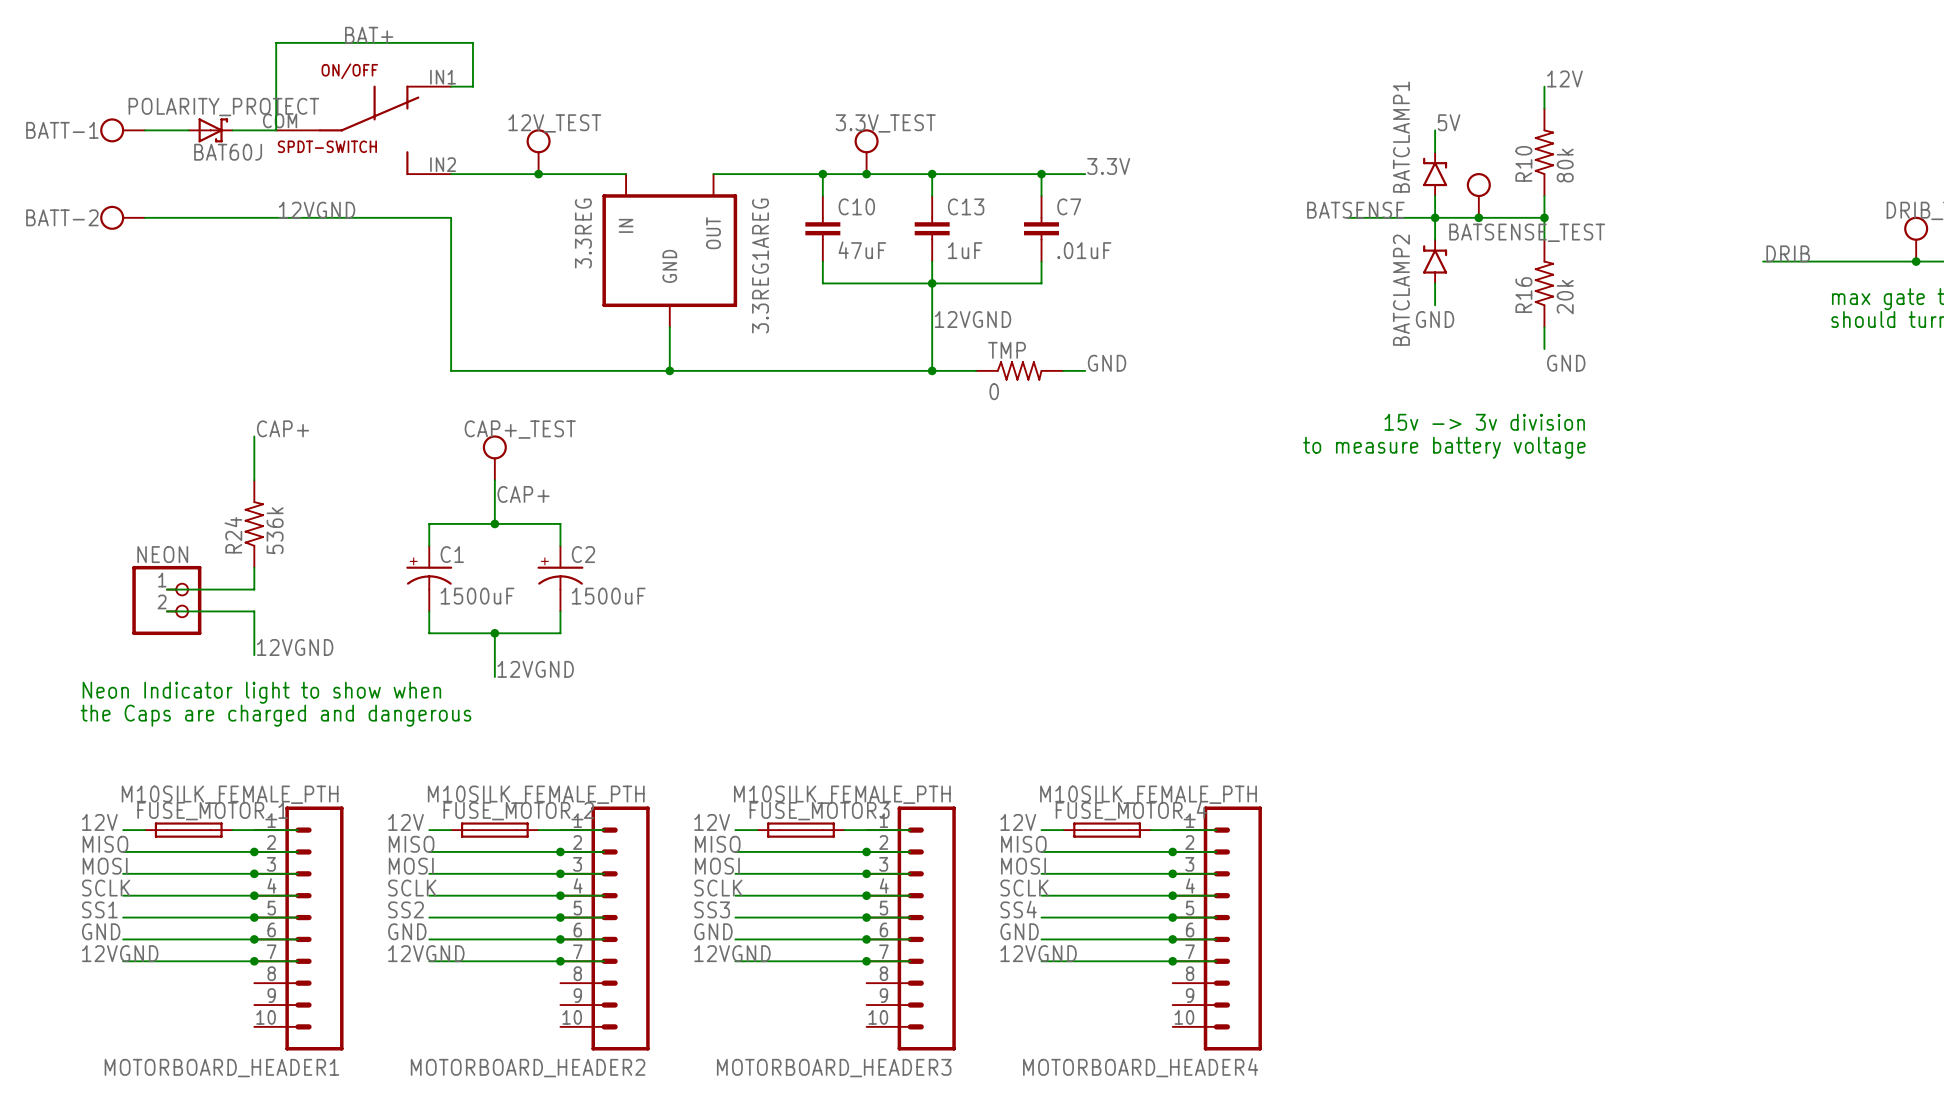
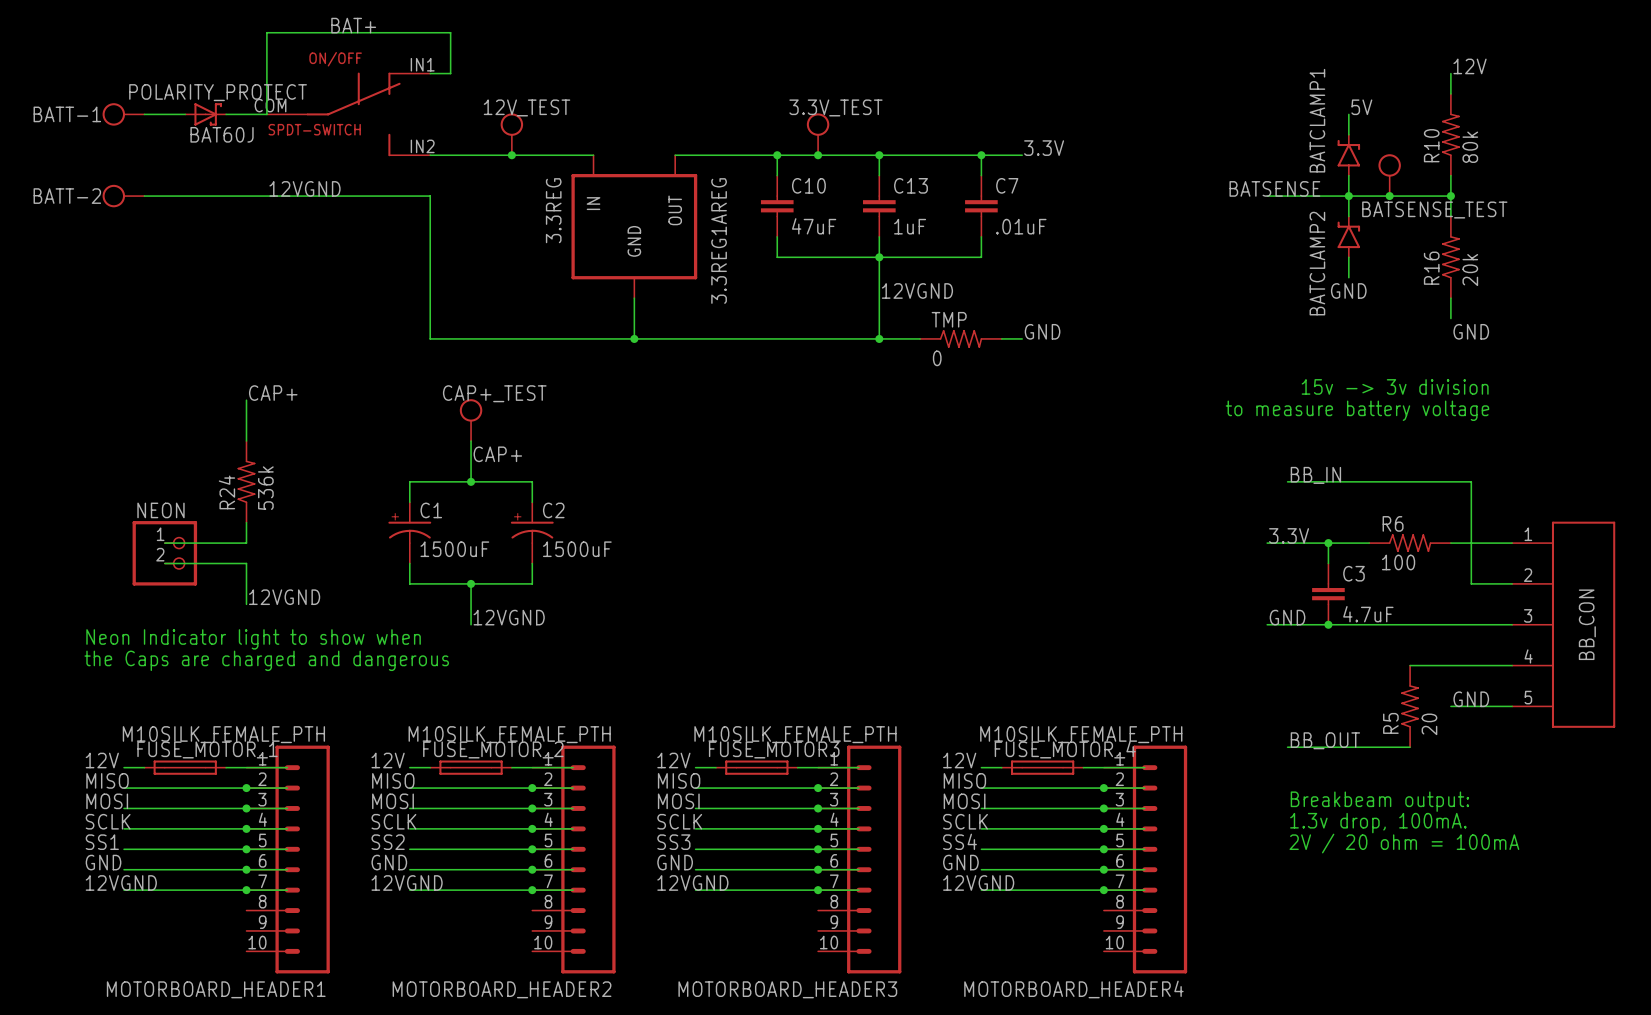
label: none -> BB_IN (1315, 475)
wire: none -> (1287, 481) (1471, 481) (1471, 583) (1512, 583)
label: none -> 3.3V (1289, 535)
wire: none -> (1267, 543) (1369, 543)
wire: none -> (1328, 543) (1328, 563)
junction: none -> (1328, 543)
R6: none -> 100 (1410, 543)
wire: none -> (1450, 543) (1512, 543)
C3: none -> 4.7uF (1328, 594)
label: none -> GND (1287, 617)
wire: none -> (1267, 624) (1512, 624)
junction: none -> (1328, 624)
BB_CON: none -> (1563, 624)
wire: none -> (1410, 665) (1512, 665)
label: none -> GND (1471, 699)
R5: none -> 20 (1410, 706)
wire: none -> (1450, 706) (1512, 706)
label: none -> BB_OUT (1325, 740)
wire: none -> (1287, 747) (1410, 747)
text: none -> Breakbeam output: (1379, 801)
text: none -> 1.3v drop, 100mA. (1378, 823)
text: none -> 2V / 20 ohm = 100mA (1404, 843)

